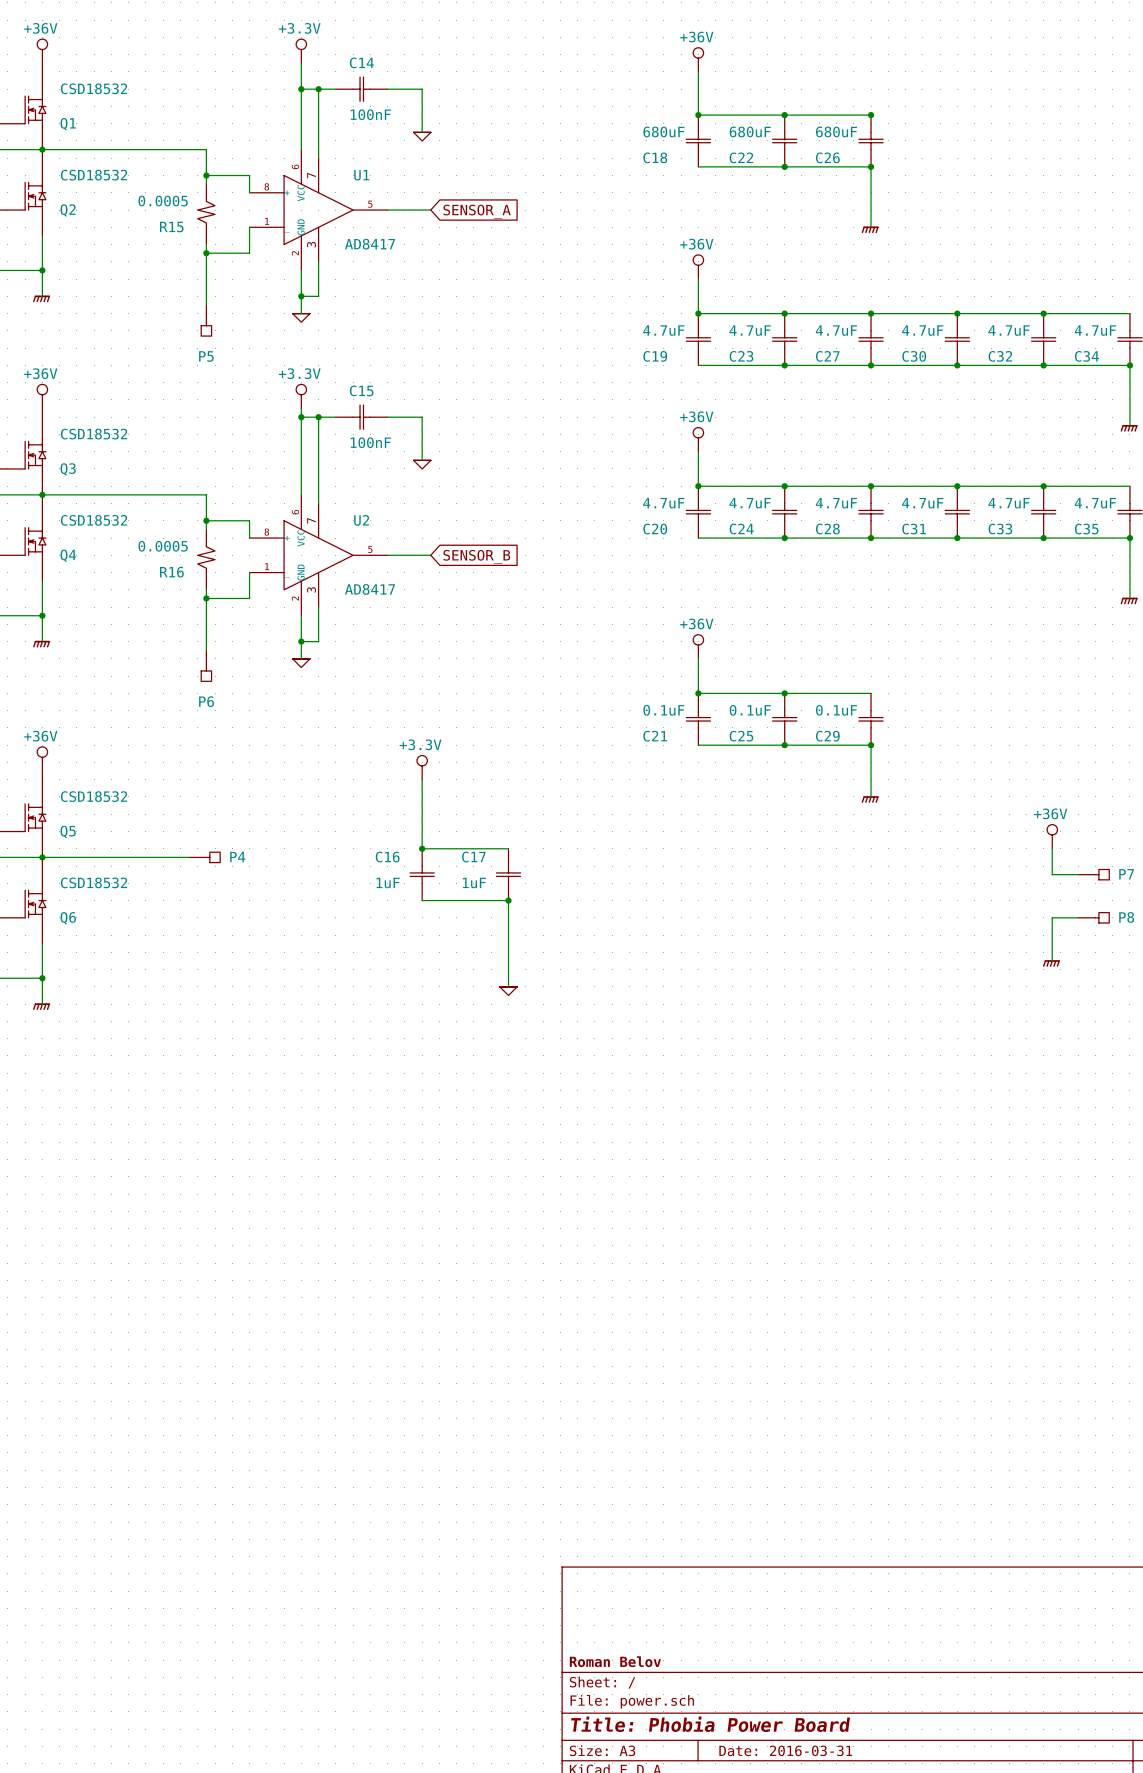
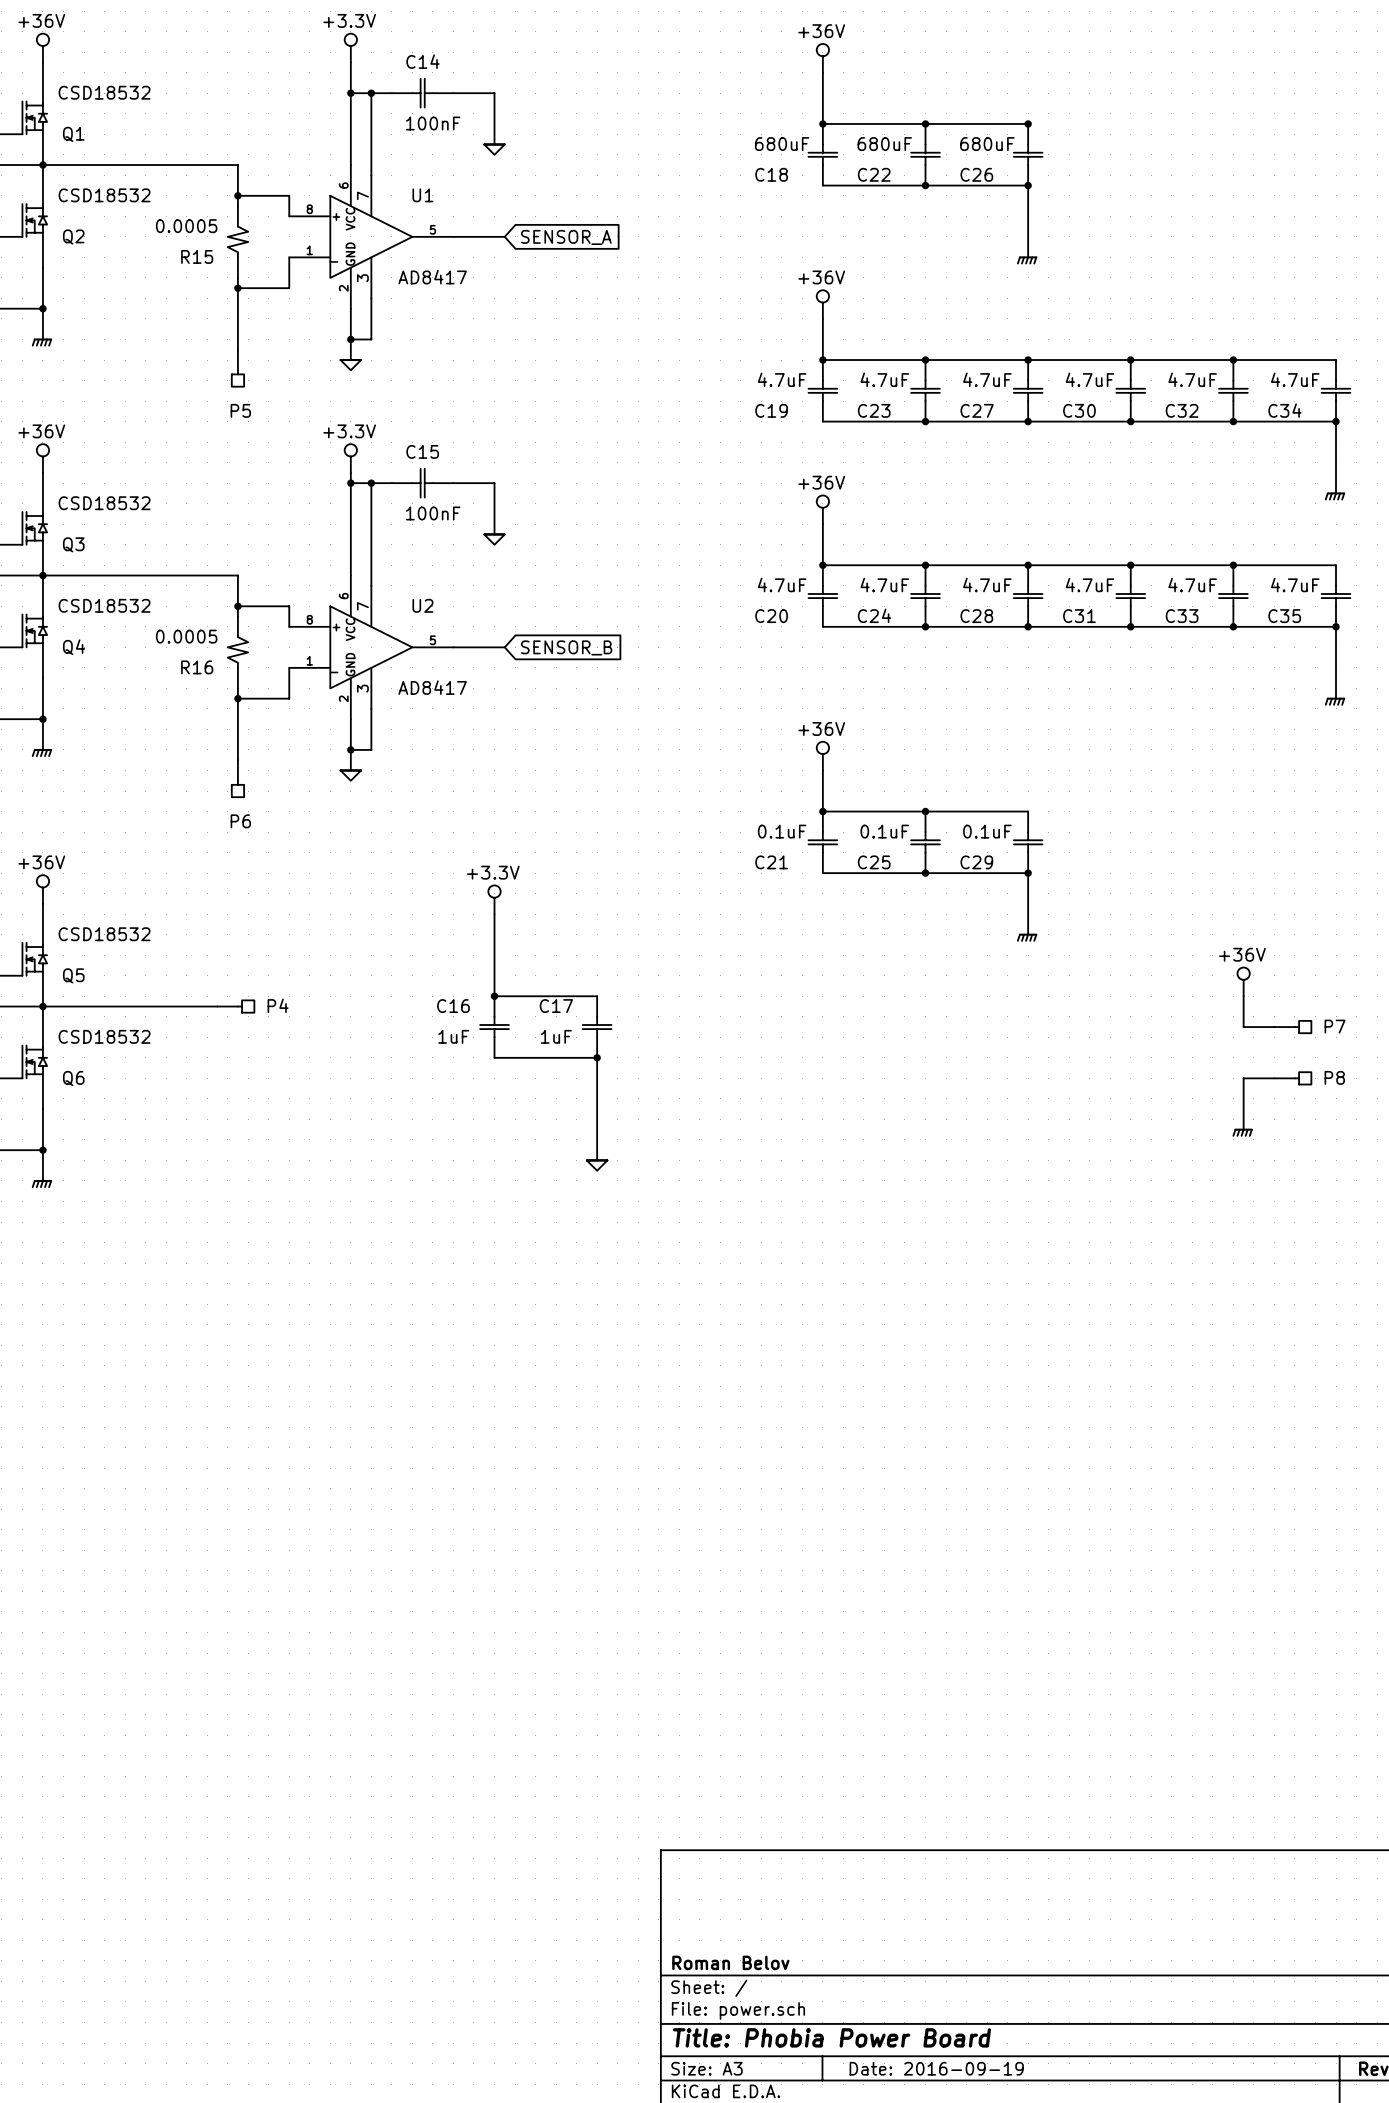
title block: Date: 2016-03-31 (785, 1750) -> Date: 2016-09-19 (936, 2068)

